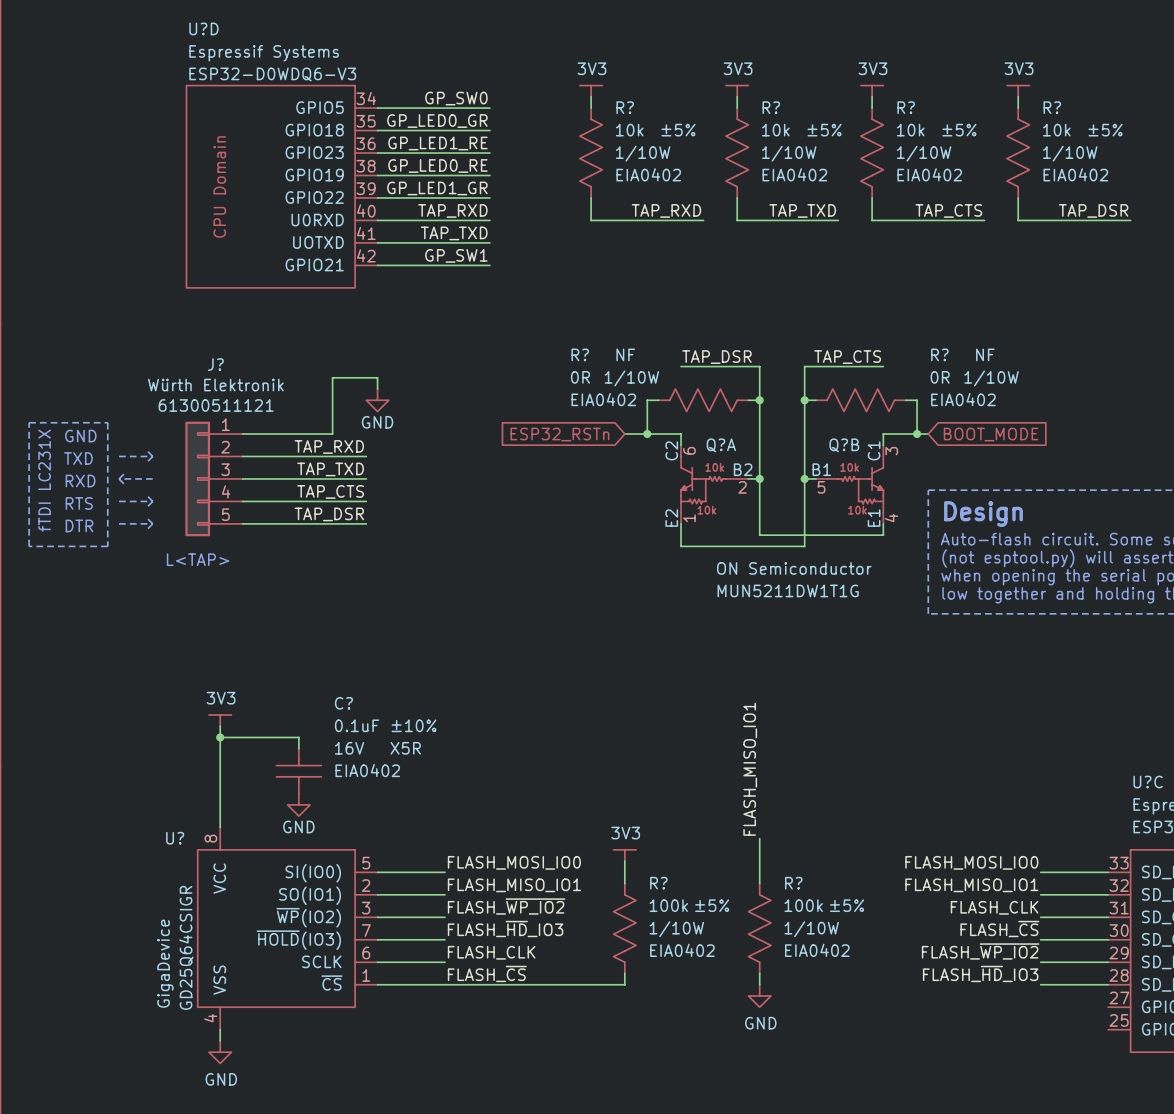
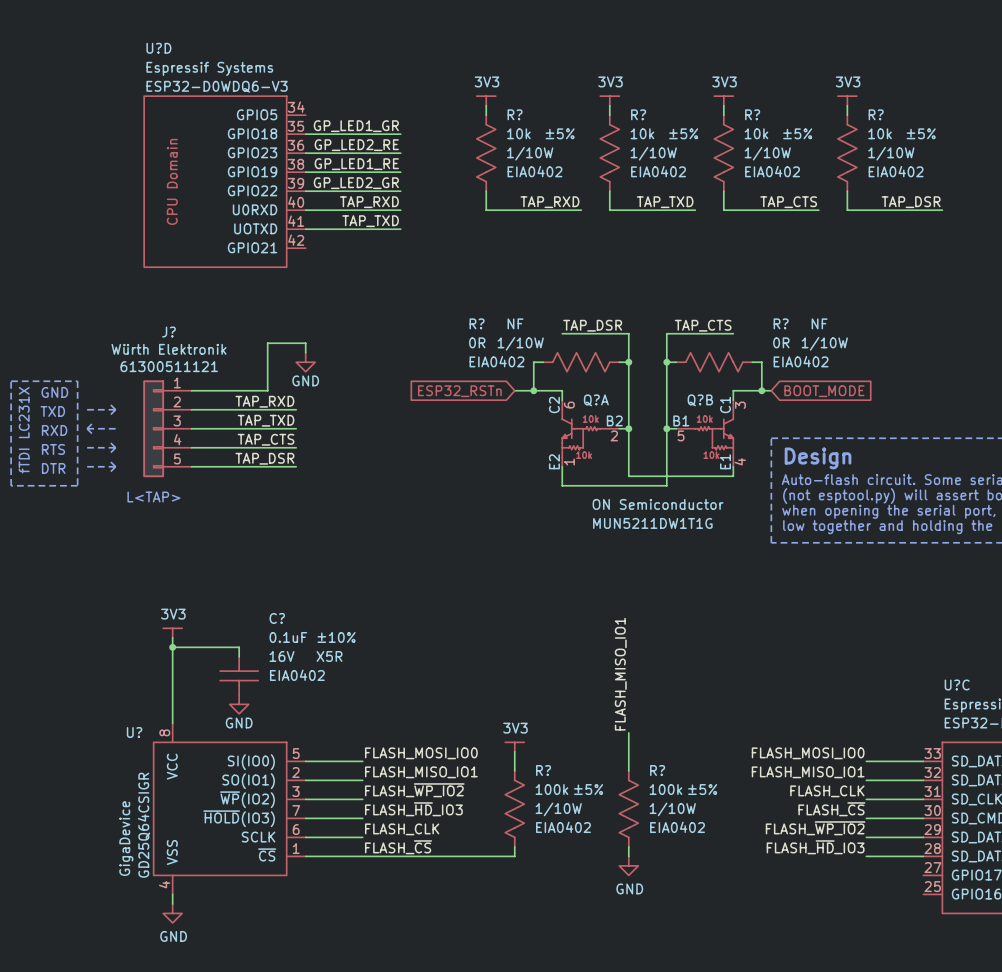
label: GP_SW0 (456, 98) -> none
wire: (377, 108) (489, 108) -> none
label: GP_LED0_GR (437, 121) -> GP_LED1_GR (356, 126)
label: GP_LED1_RE (437, 143) -> GP_LED2_RE (356, 145)
label: GP_LED0_RE (437, 165) -> GP_LED1_RE (356, 164)
label: GP_LED1_GR (437, 188) -> GP_LED2_GR (356, 183)
label: GP_SW1 (456, 255) -> none
wire: (377, 265) (489, 265) -> none

